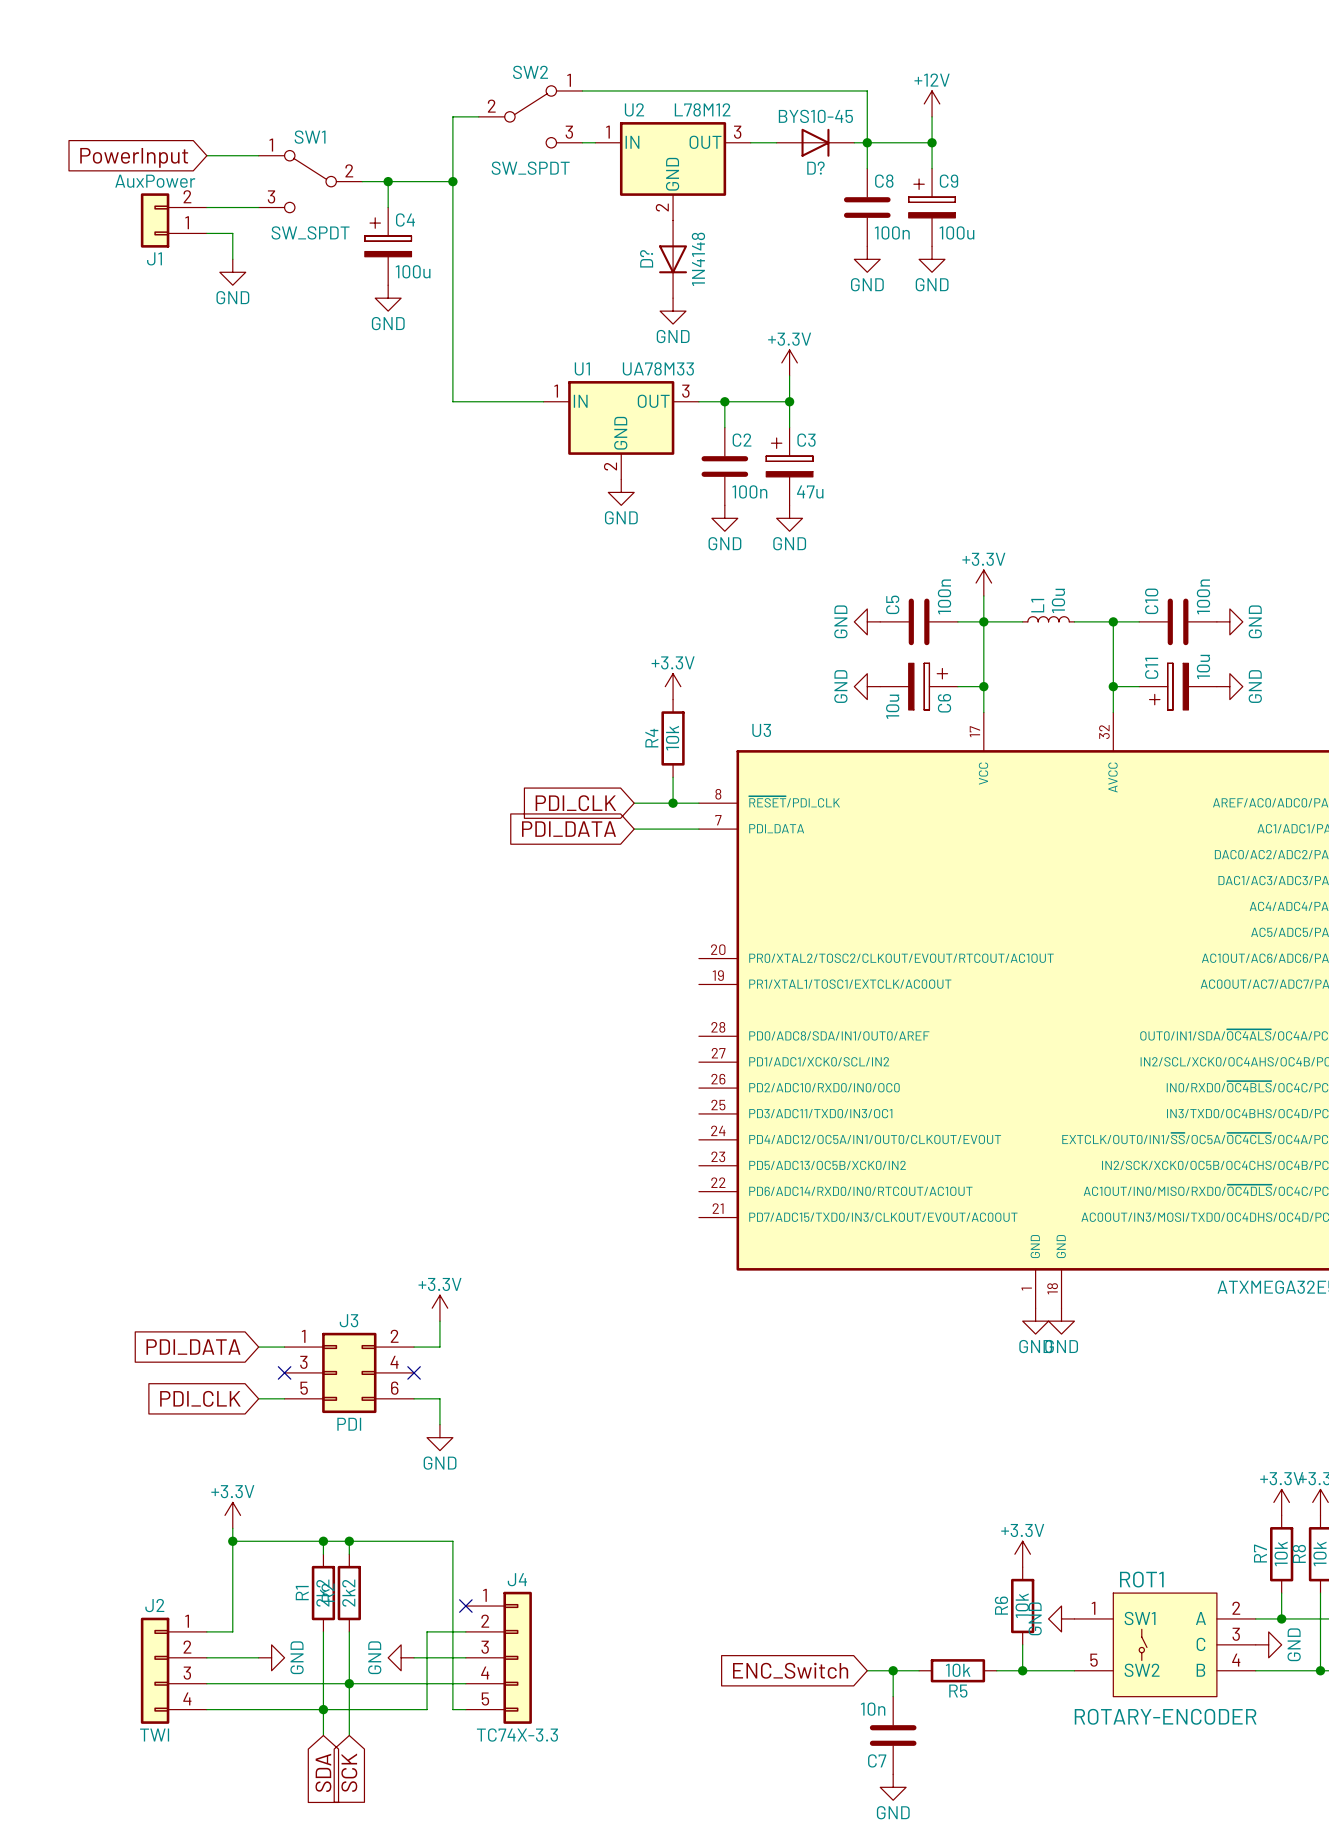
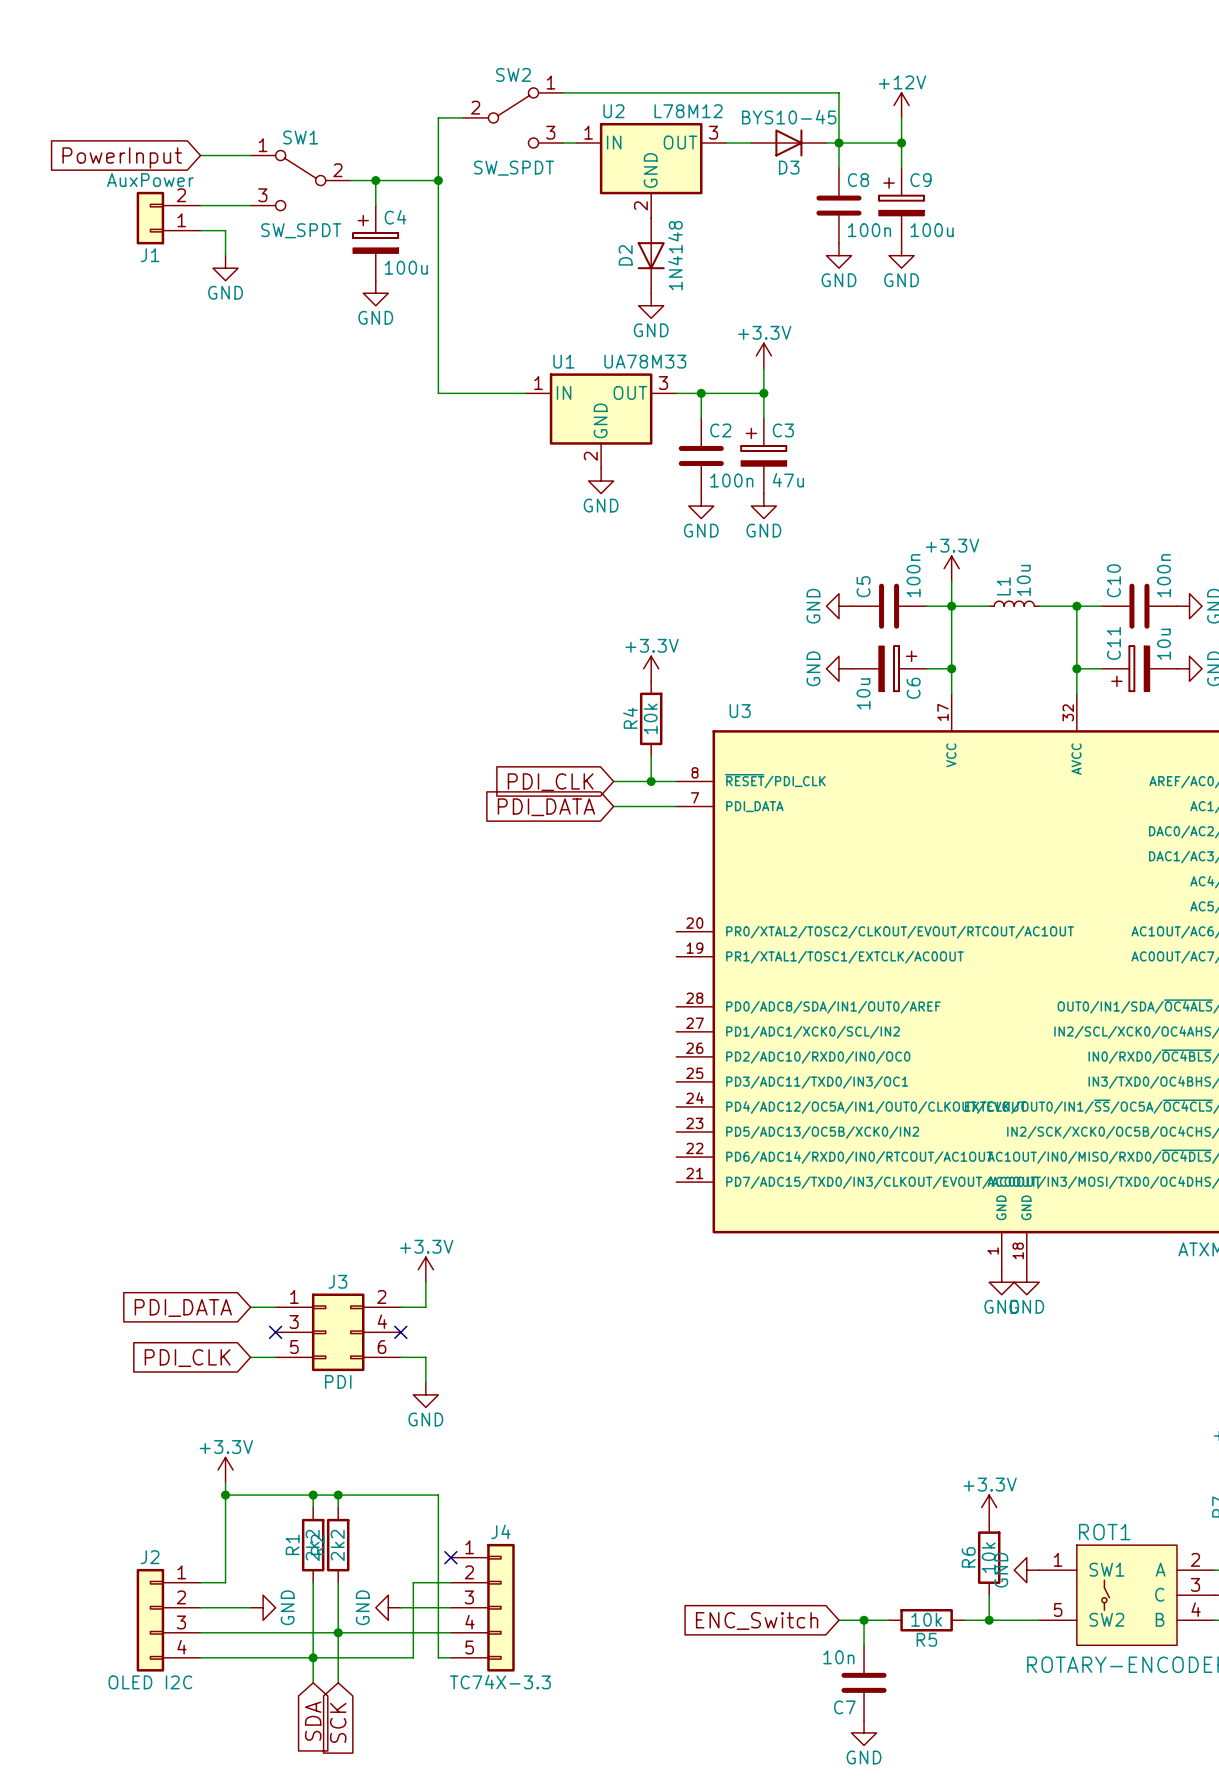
D? name: D? (815, 168) -> D3 (789, 167)
D? name: D? (646, 258) -> D2 (625, 255)
J2 value: TWI (154, 1735) -> OLED I2C (150, 1682)

